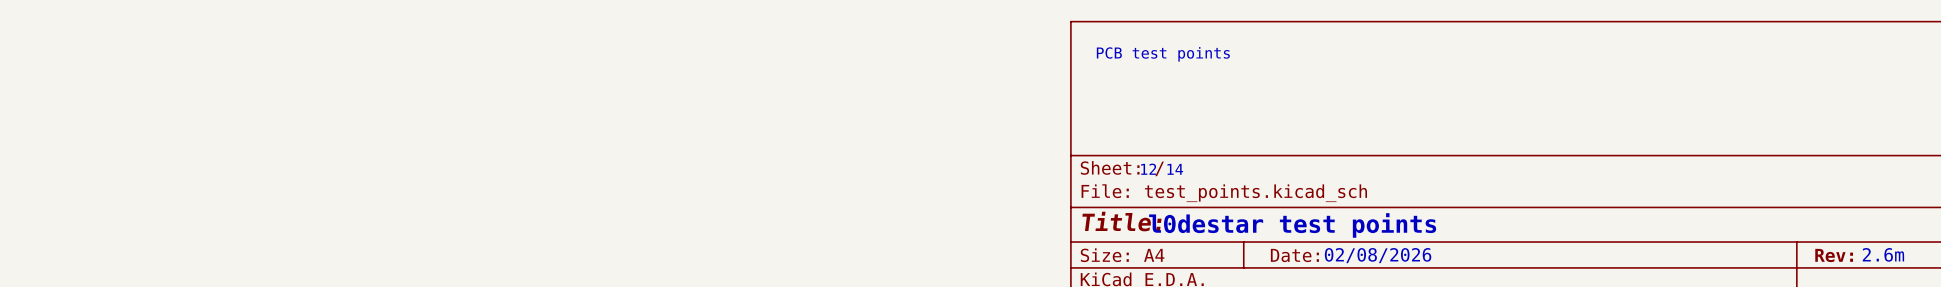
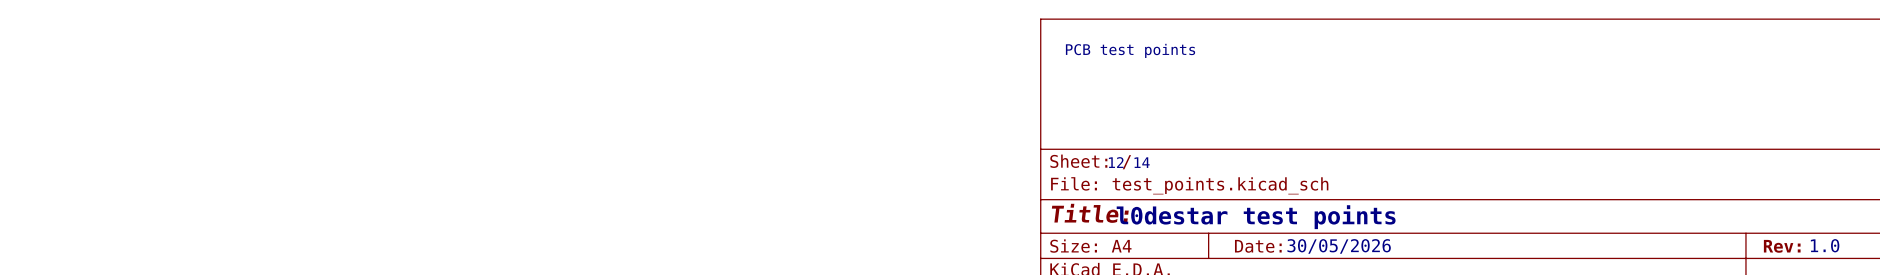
text: 2.6m (1883, 254) -> 1.0 (1825, 245)
text: 02/08/2026 (1378, 255) -> 30/05/2026 (1339, 246)

